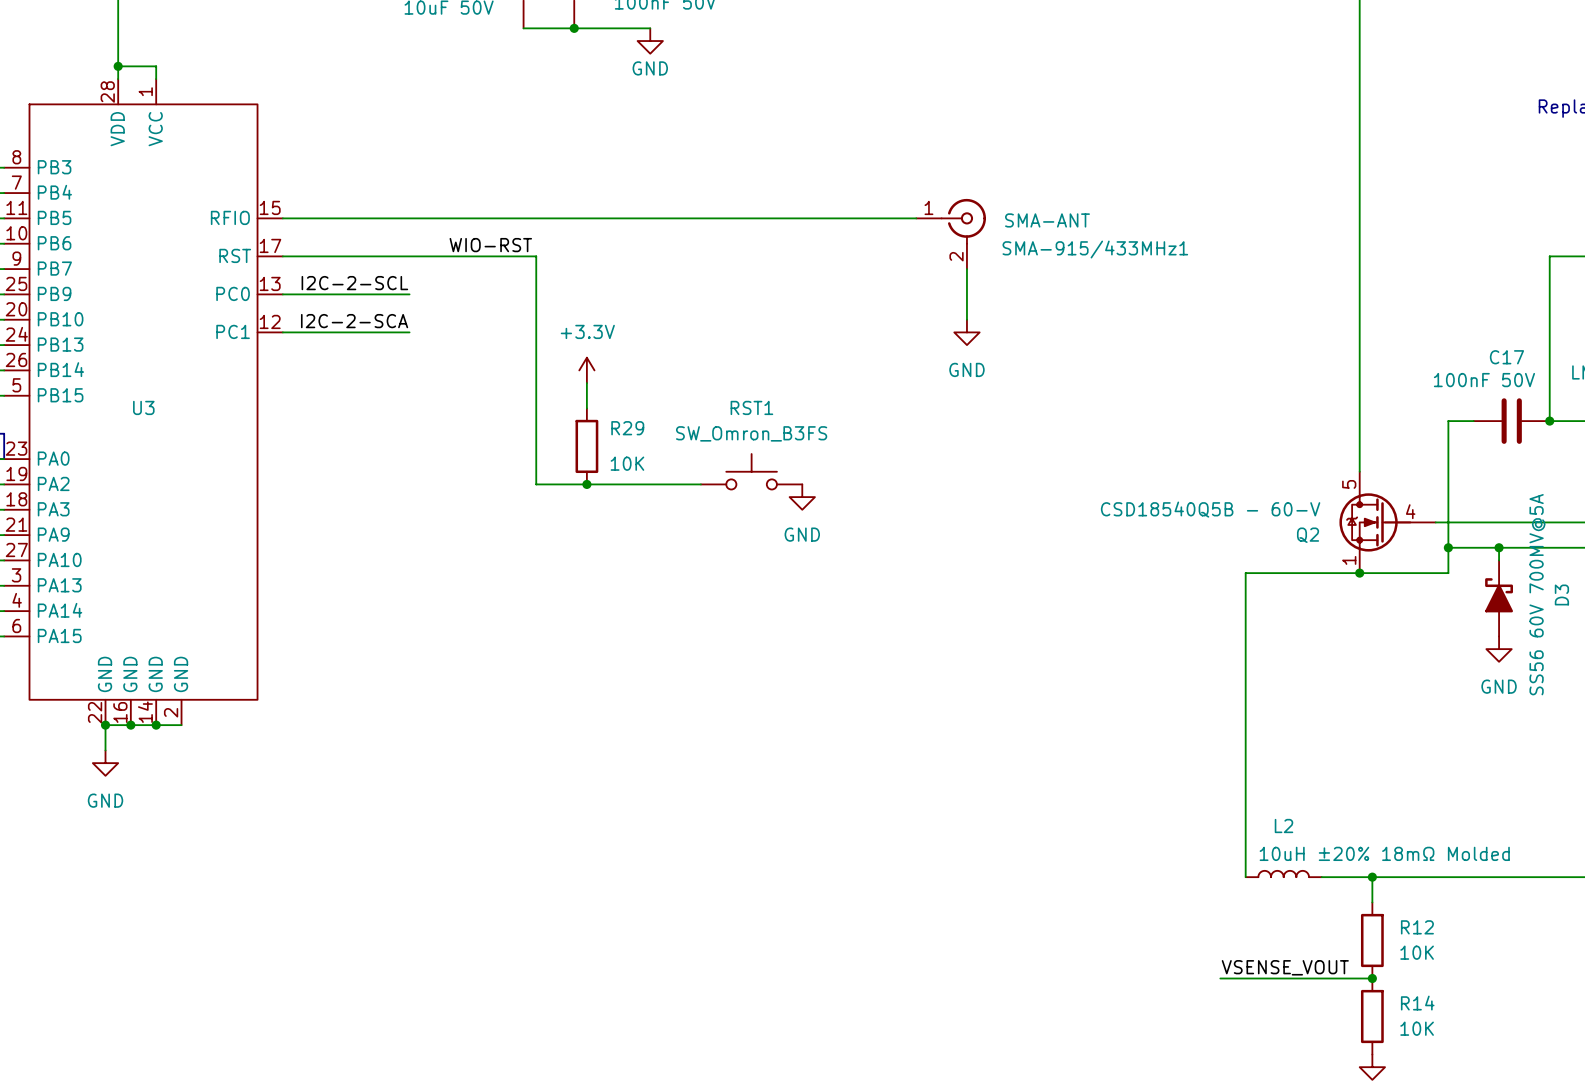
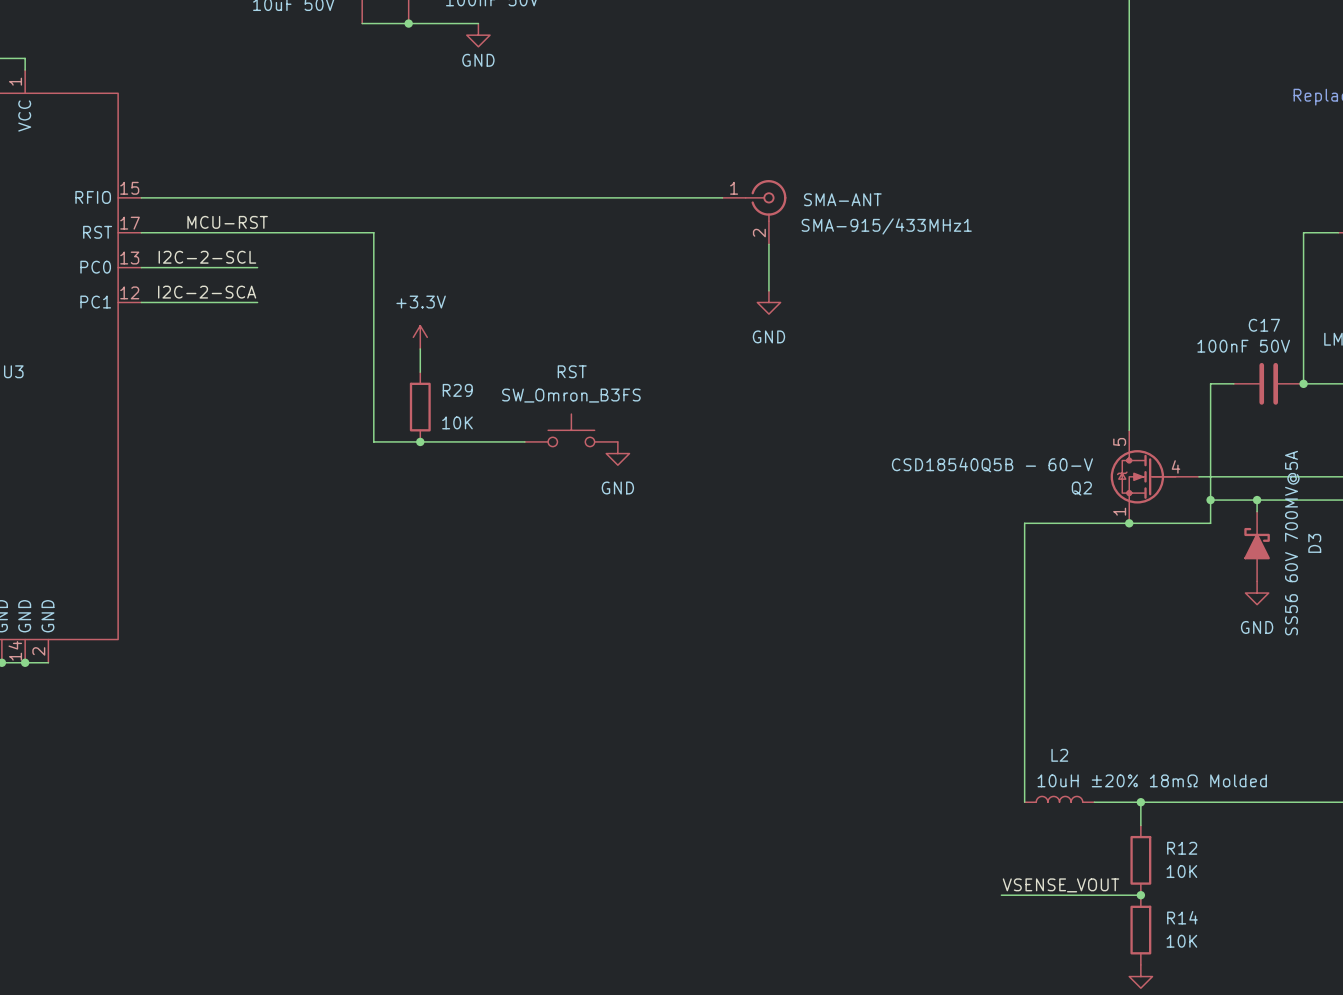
label: none -> MCU-RST (227, 222)
label: WIO-RST (490, 245) -> none
RST1 name: RST1 (751, 407) -> RST (572, 371)

